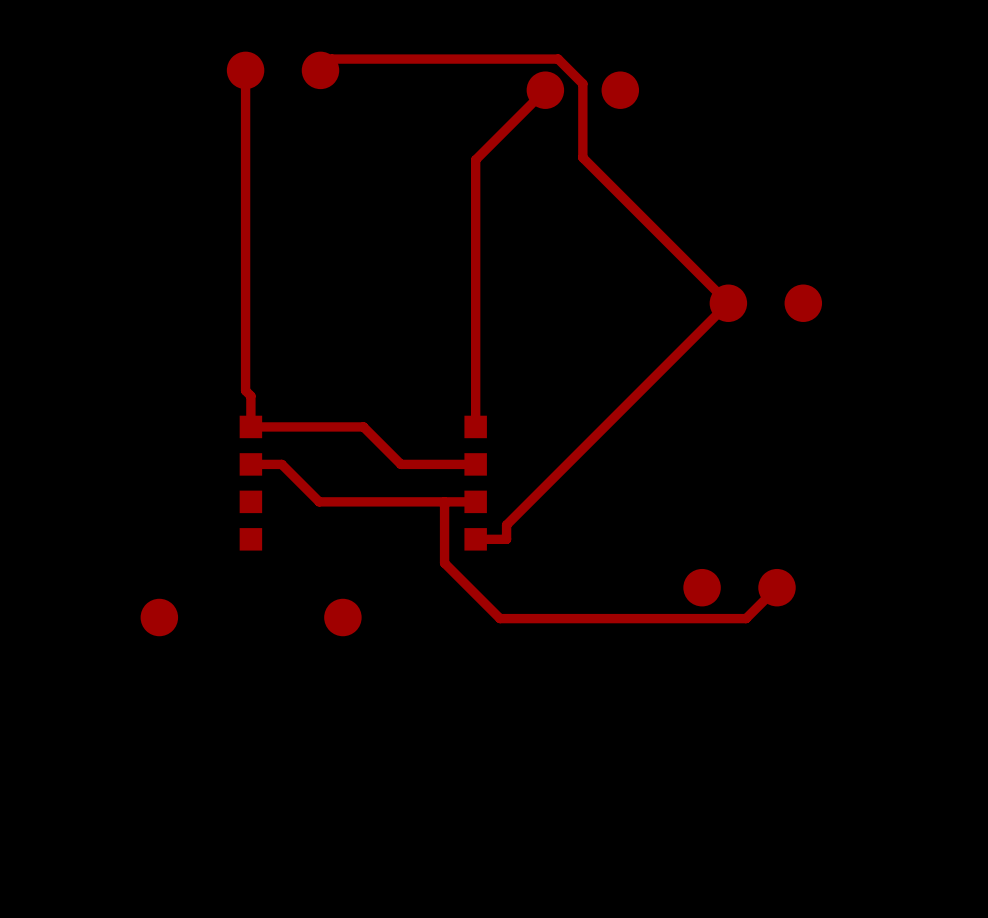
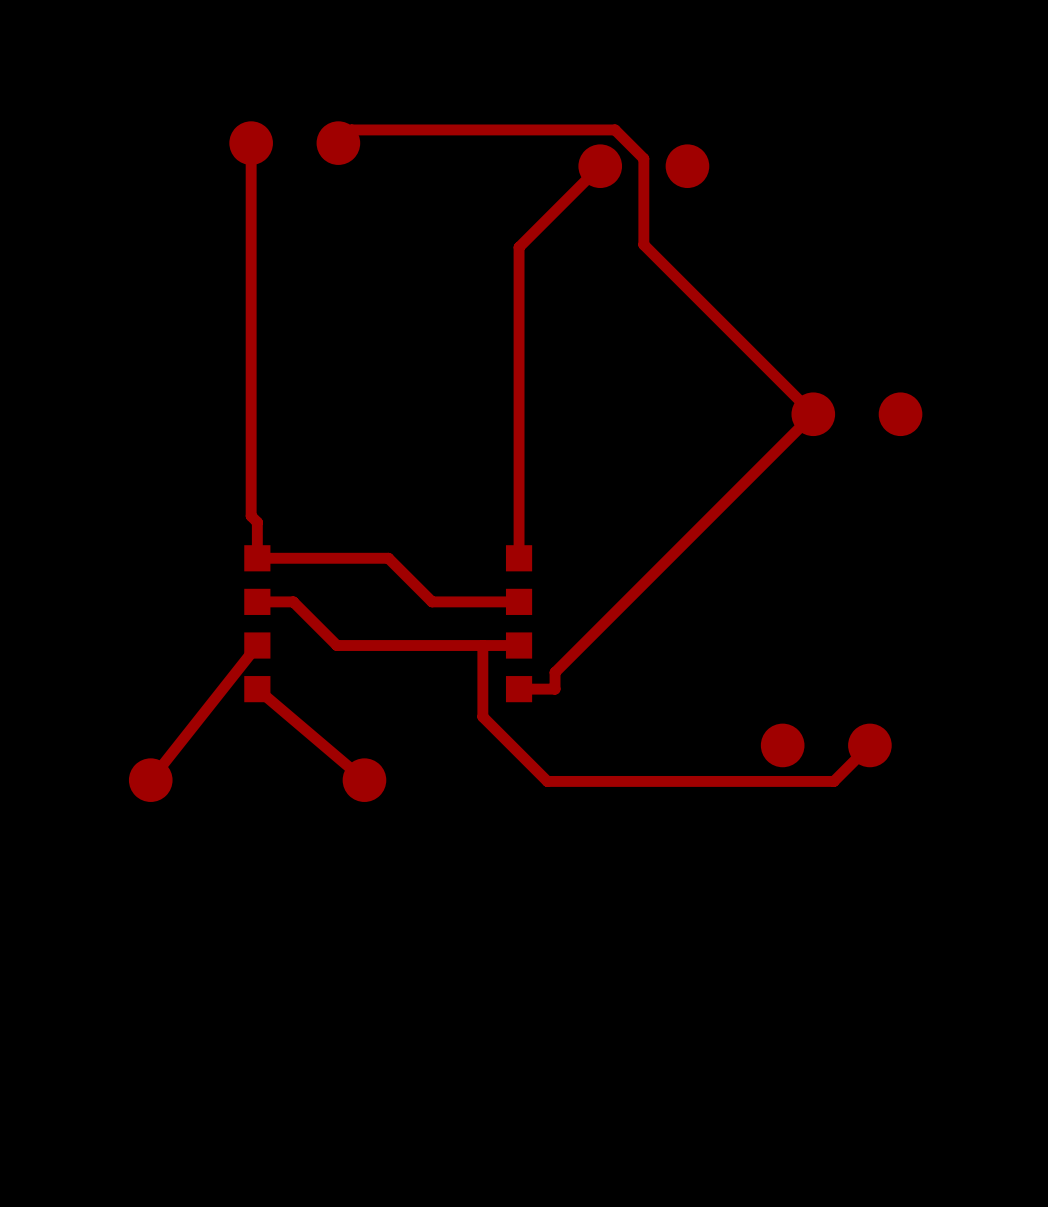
track: none -> (257, 645) (150, 780)
track: none -> (257, 689) (364, 780)

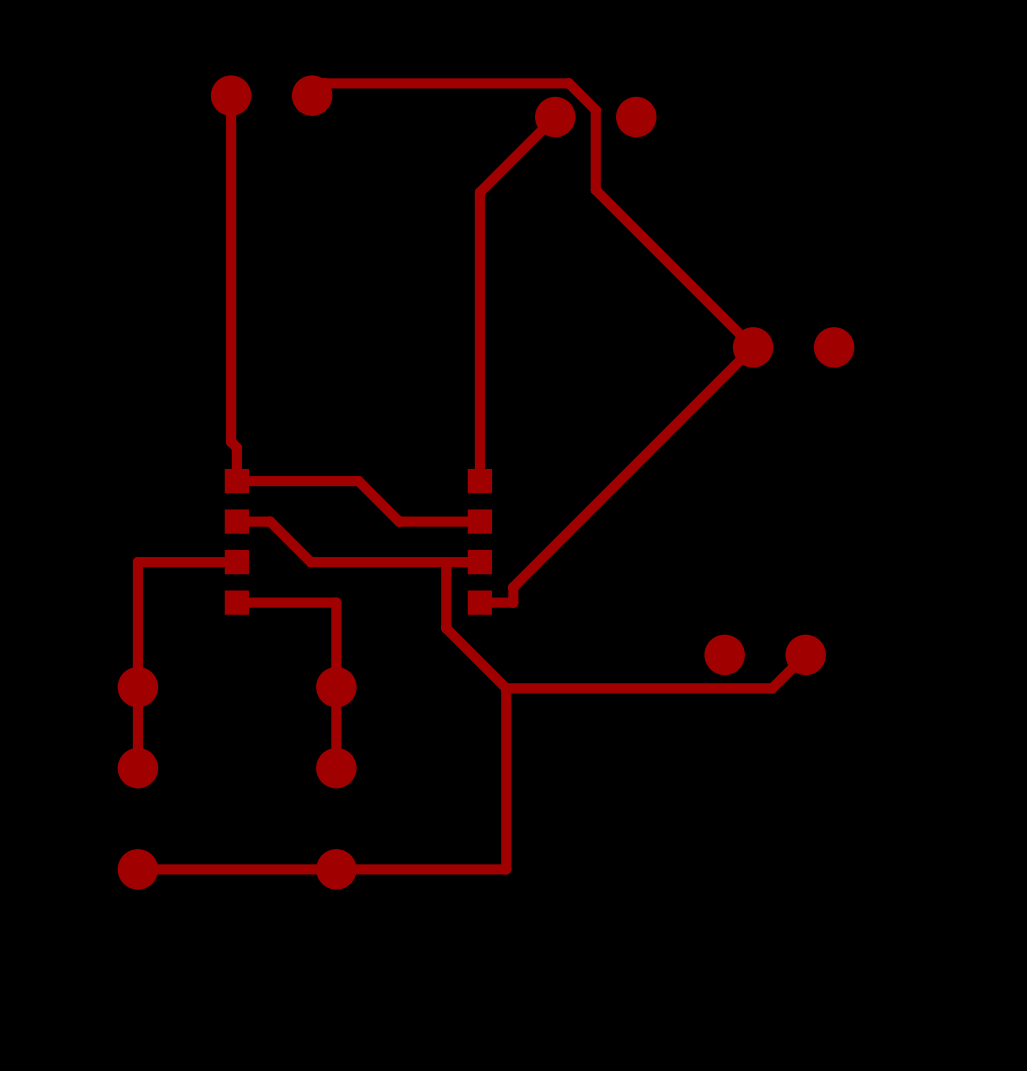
track: (257, 645) (150, 780) -> (236, 562) (137, 562) (137, 768)
track: (257, 689) (364, 780) -> (236, 602) (336, 602) (336, 768)
track: none -> (506, 688) (506, 869) (137, 869)
part: none -> (137, 818)
part: none -> (336, 818)

